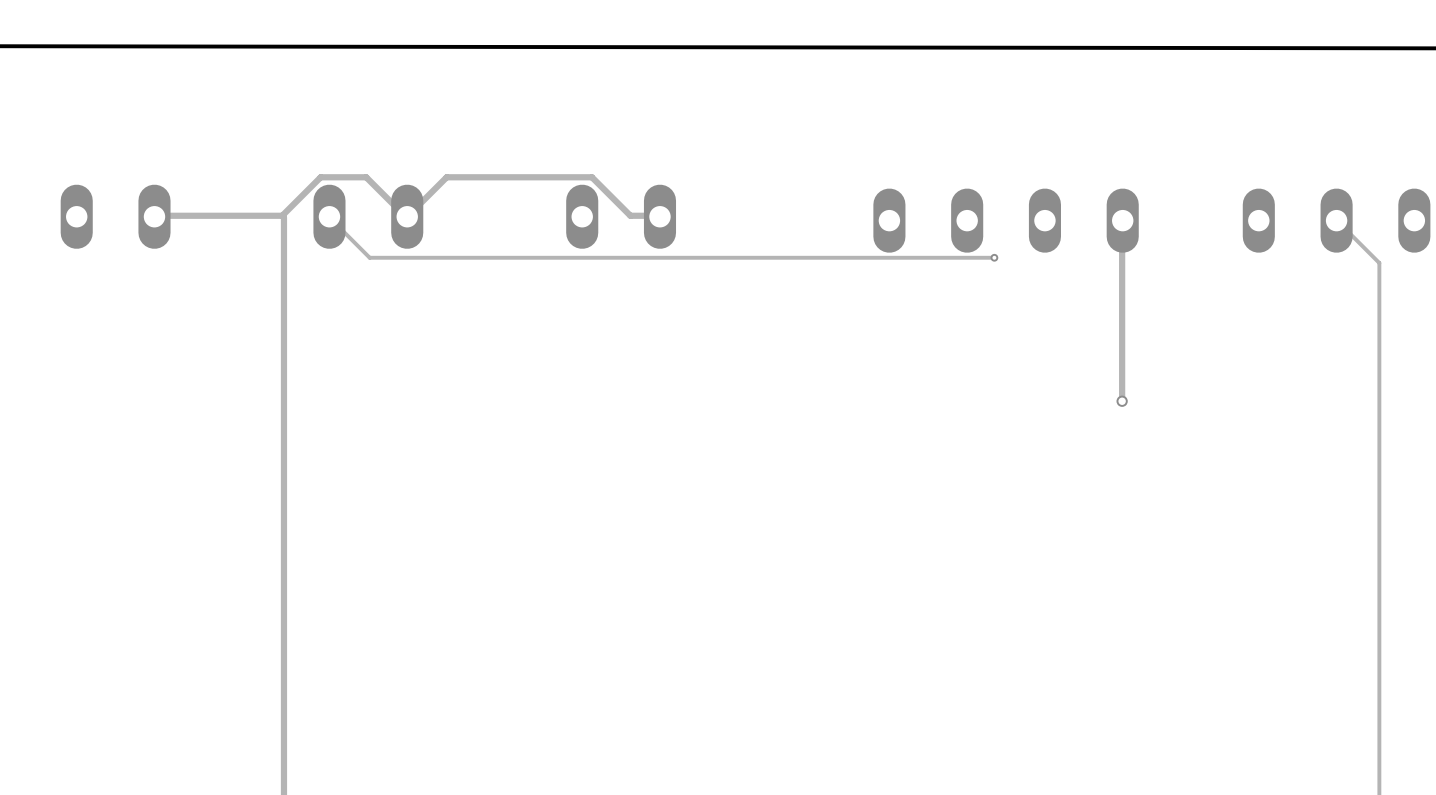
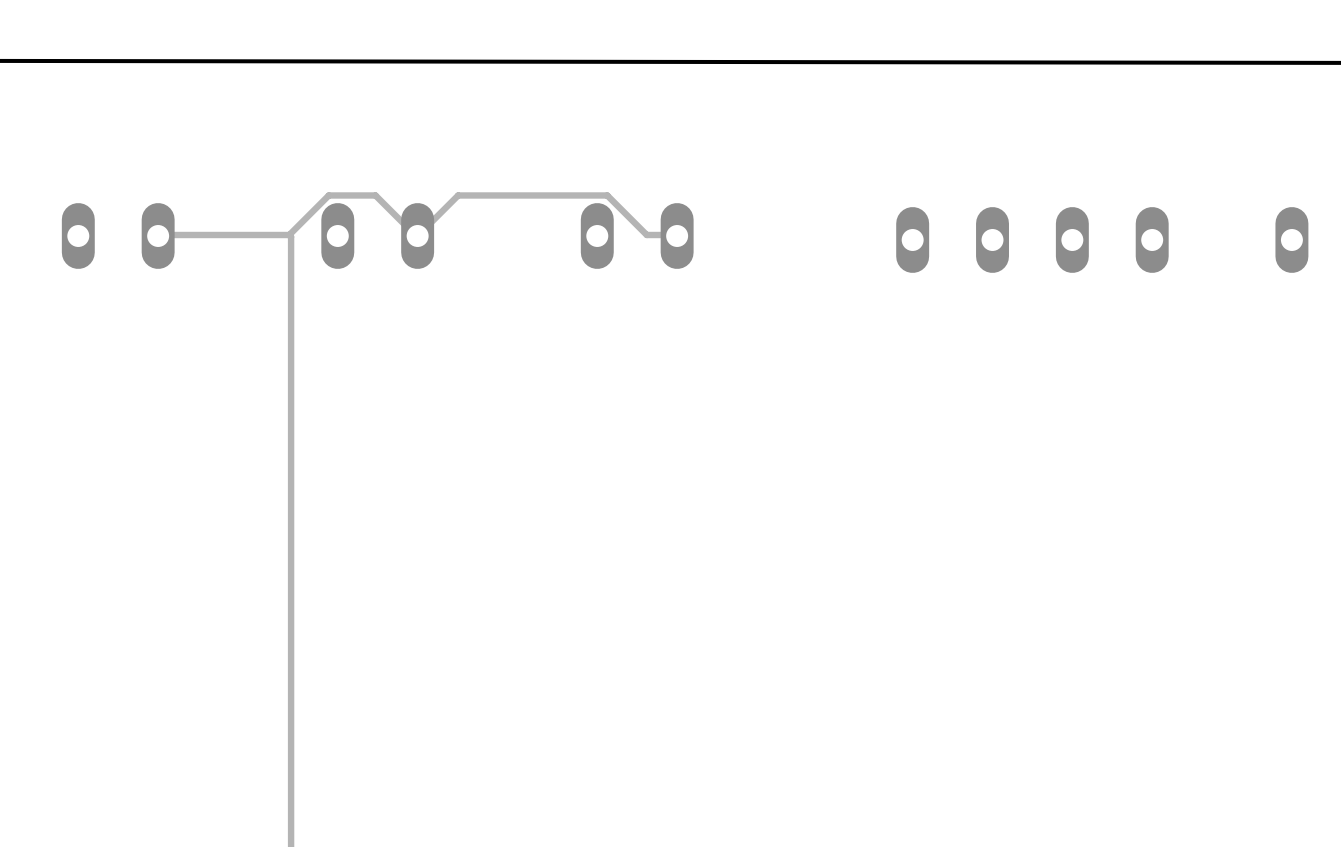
track: (329, 216) (369, 257) (994, 257) -> none
track: (1122, 220) (1122, 401) -> none
via: (994, 257) -> none
via: (1122, 401) -> none

